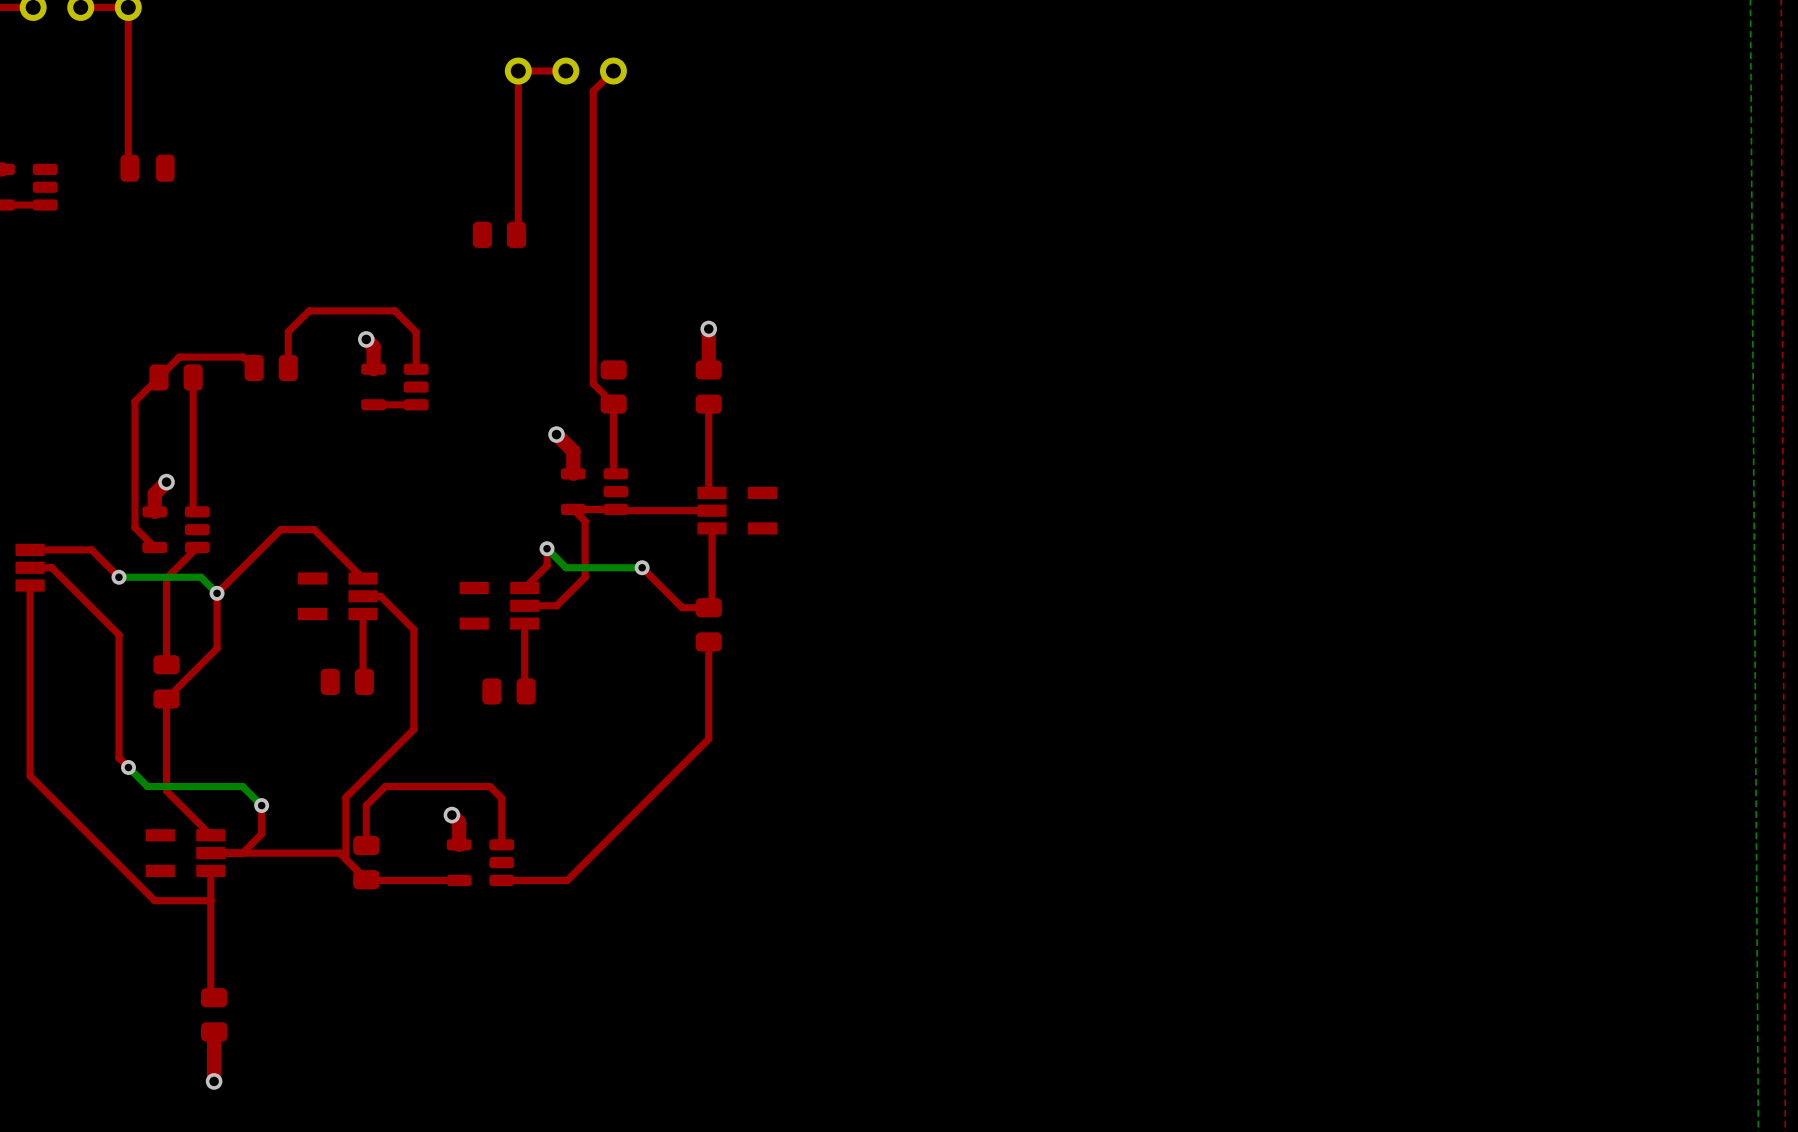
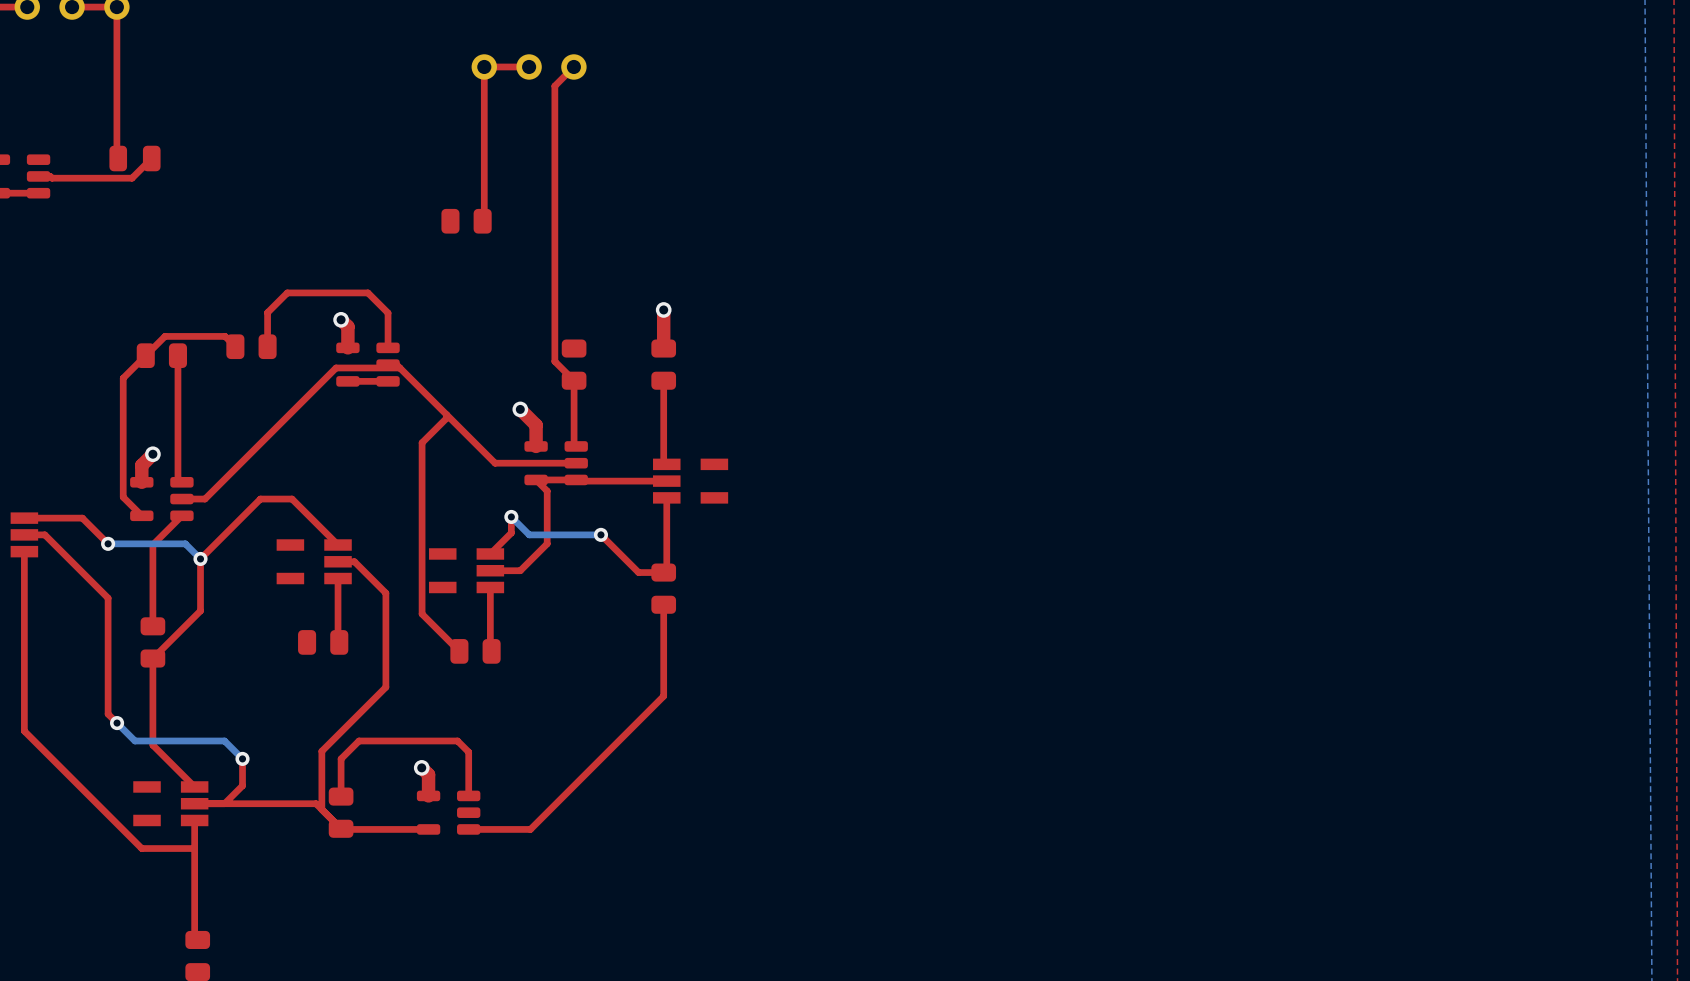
top track: none -> (151, 158) (132, 178) (52, 178) (50, 176) (38, 176)
top track: none -> (388, 364) (396, 364) (495, 463) (576, 463)
top track: none -> (399, 367) (336, 367) (205, 499) (181, 499)
top track: none -> (446, 414) (446, 418) (422, 442) (422, 614) (459, 651)

